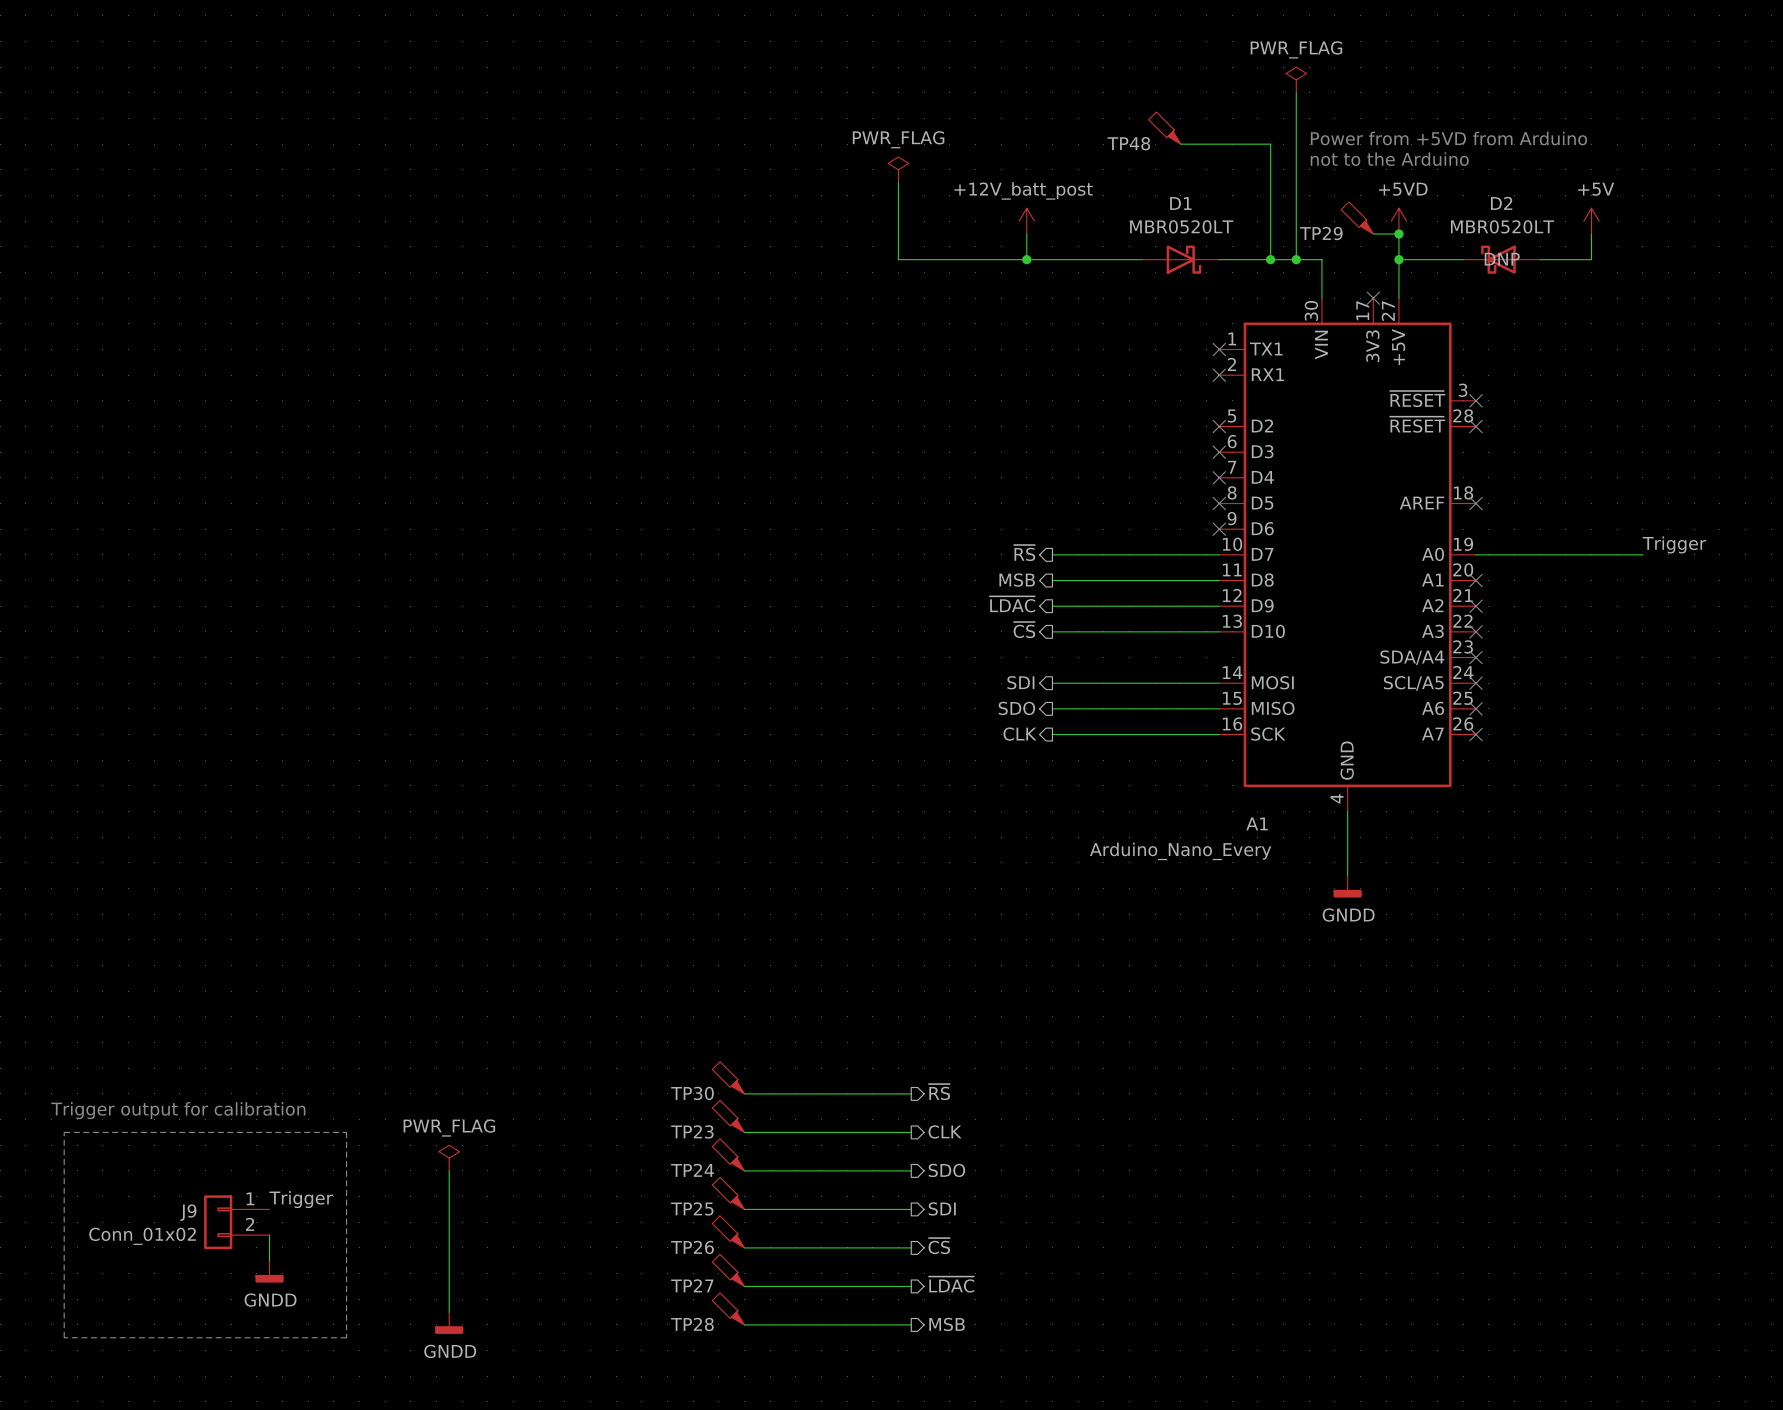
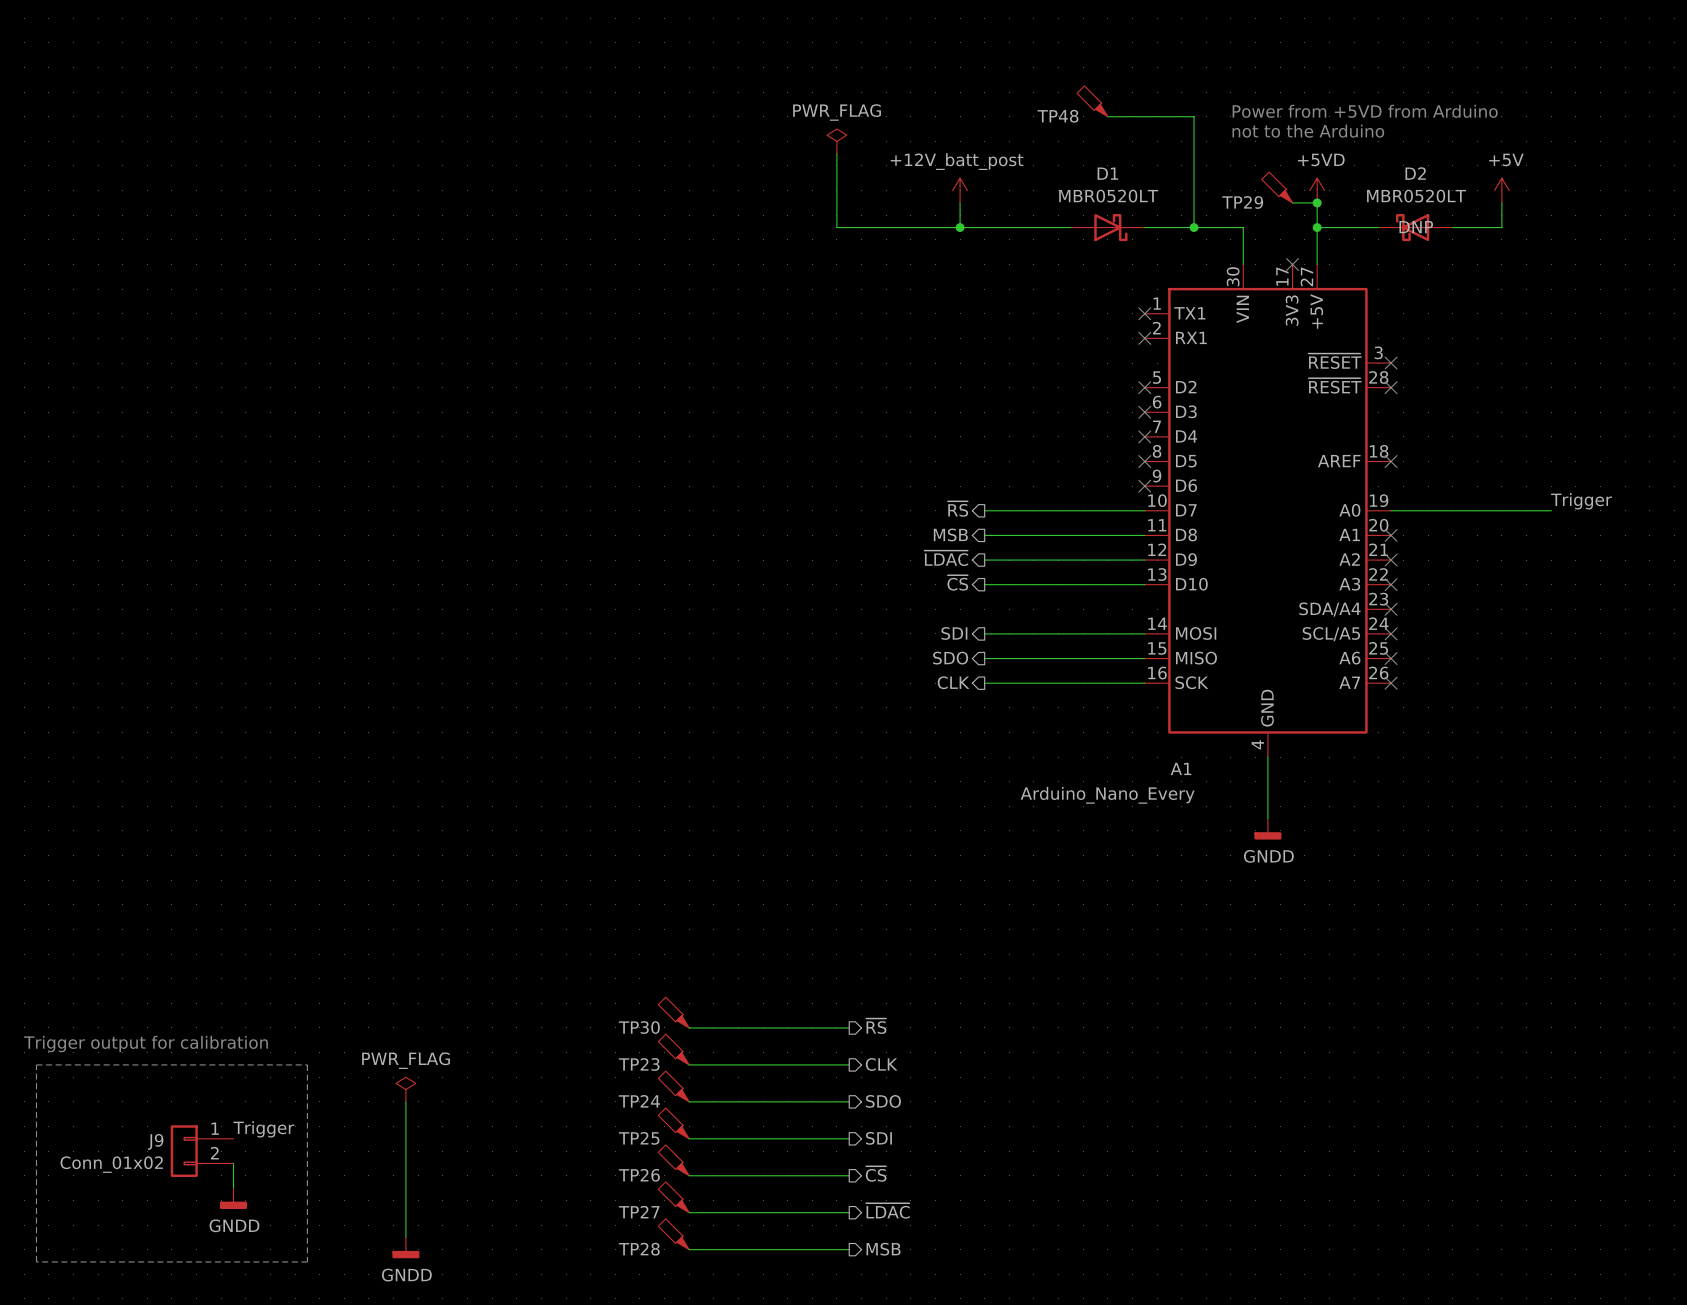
power symbol: PWR_FLAG (1296, 79) -> none
wire: (1296, 92) (1296, 259) -> none
junction: (1296, 259) -> none

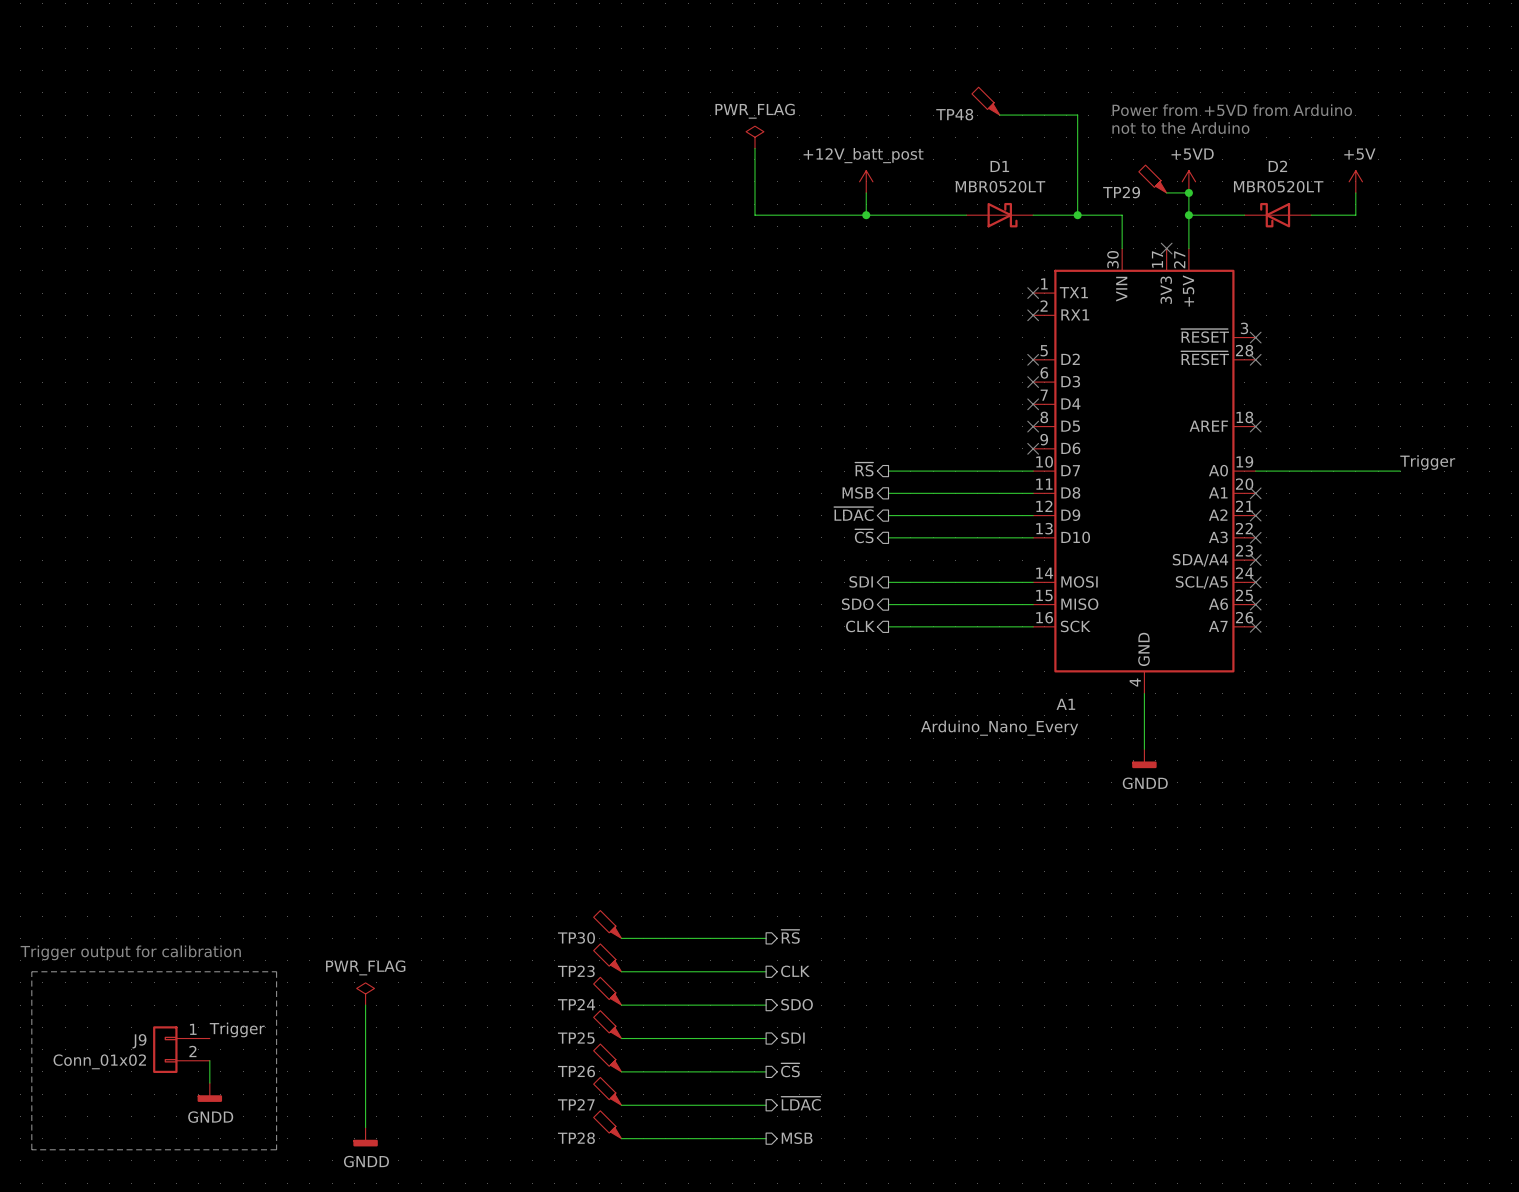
D2 text: DNP (1416, 227) -> none

